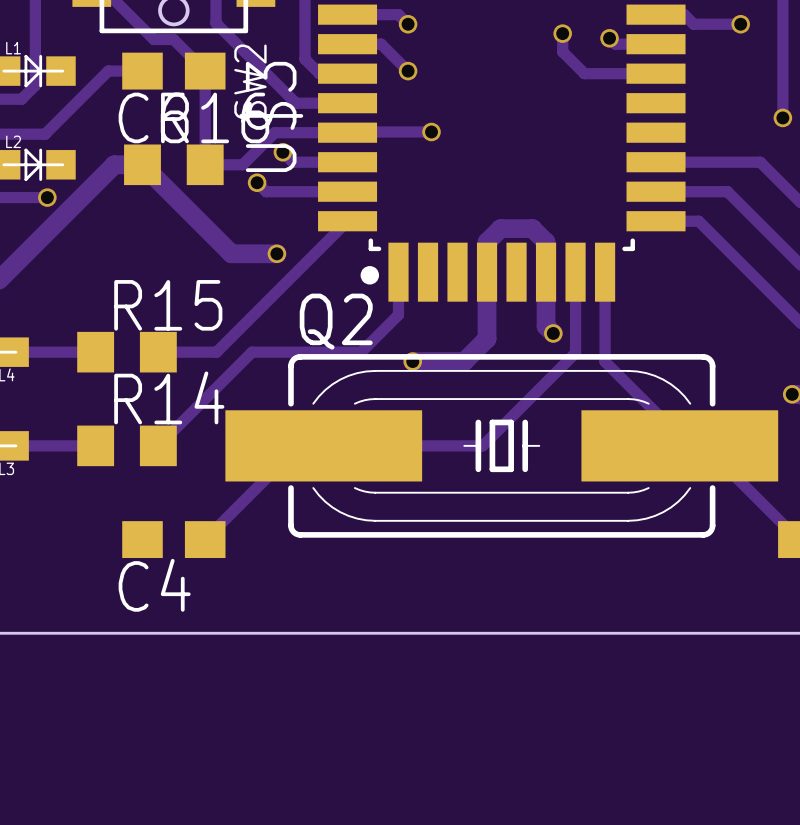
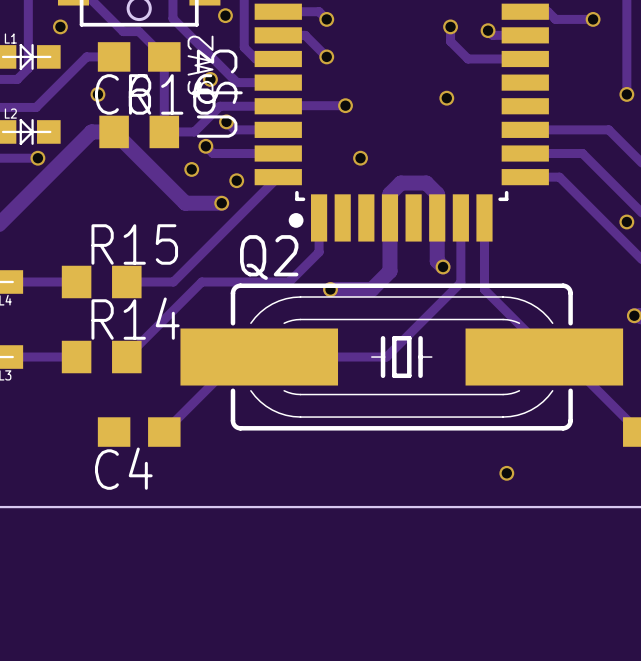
via: none -> (225, 15)
via: none -> (60, 26)
via: none -> (210, 79)
via: none -> (97, 94)
via: none -> (446, 98)
via: none -> (360, 158)
via: none -> (191, 169)
via: none -> (236, 180)
via: none -> (626, 221)
via: none -> (506, 473)

